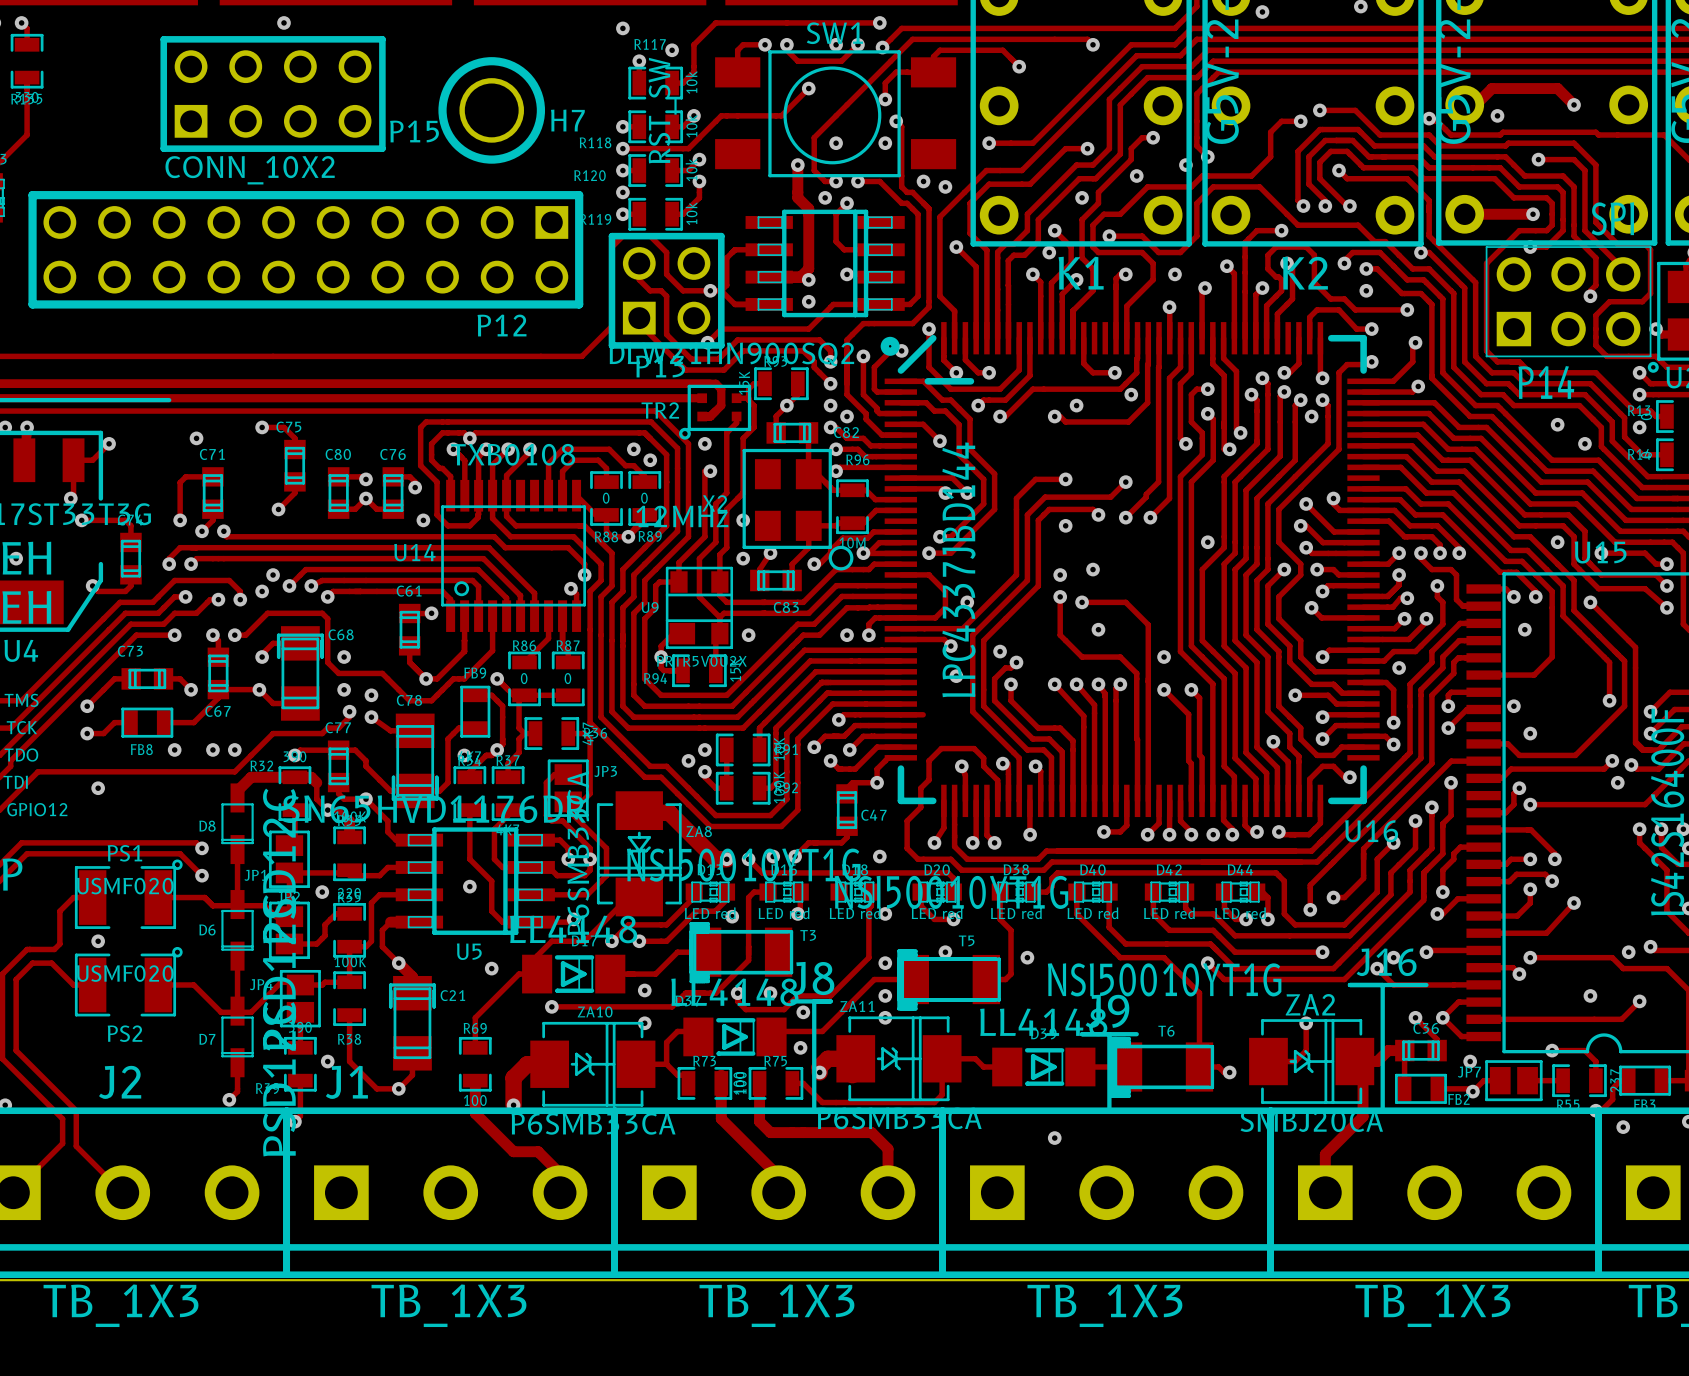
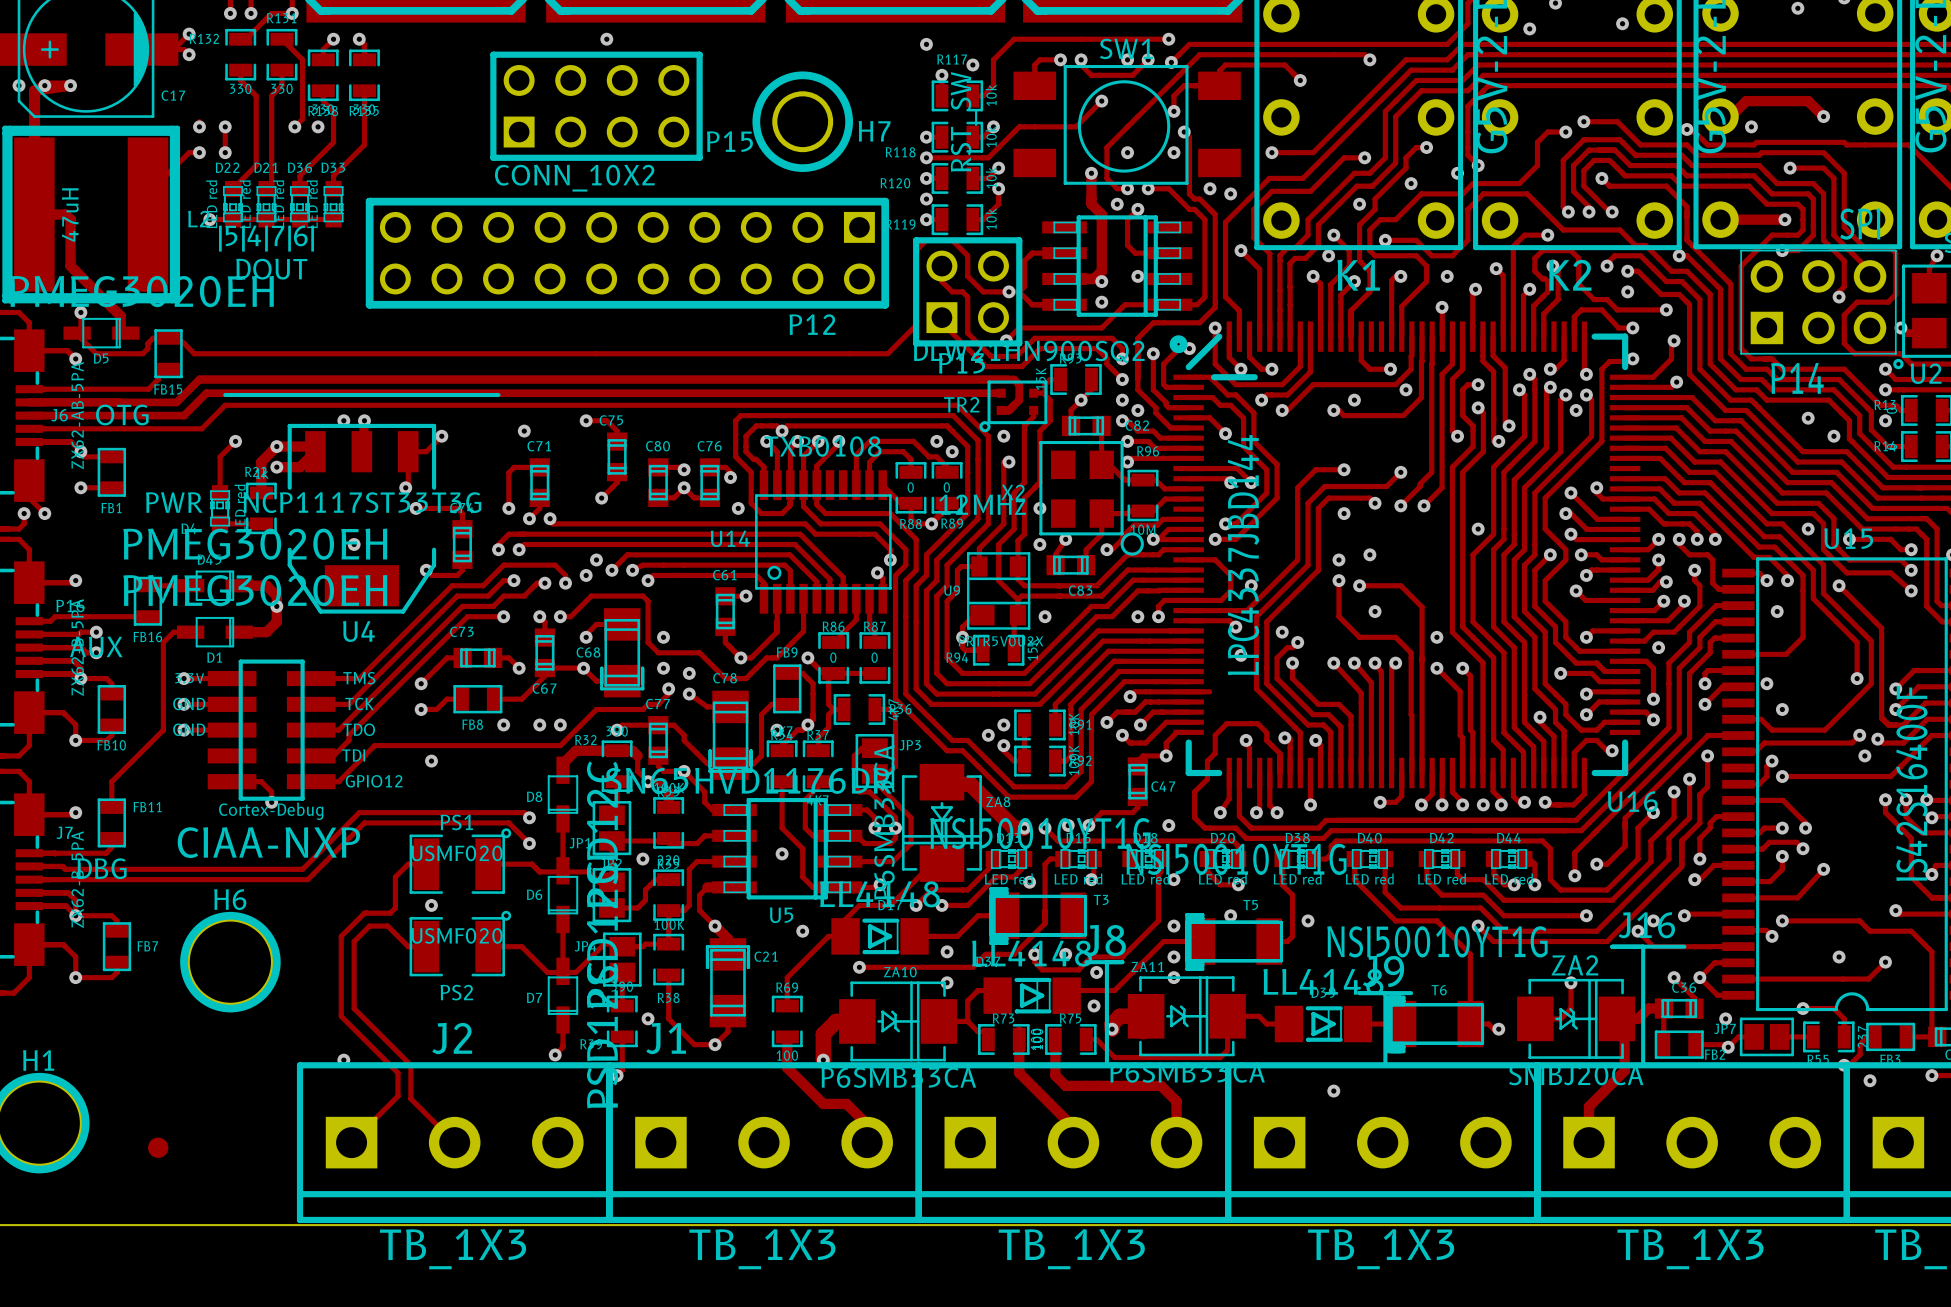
C68 rotation: 0° (300, 673) -> 180° (622, 652)
via: (1628, 952) -> none

